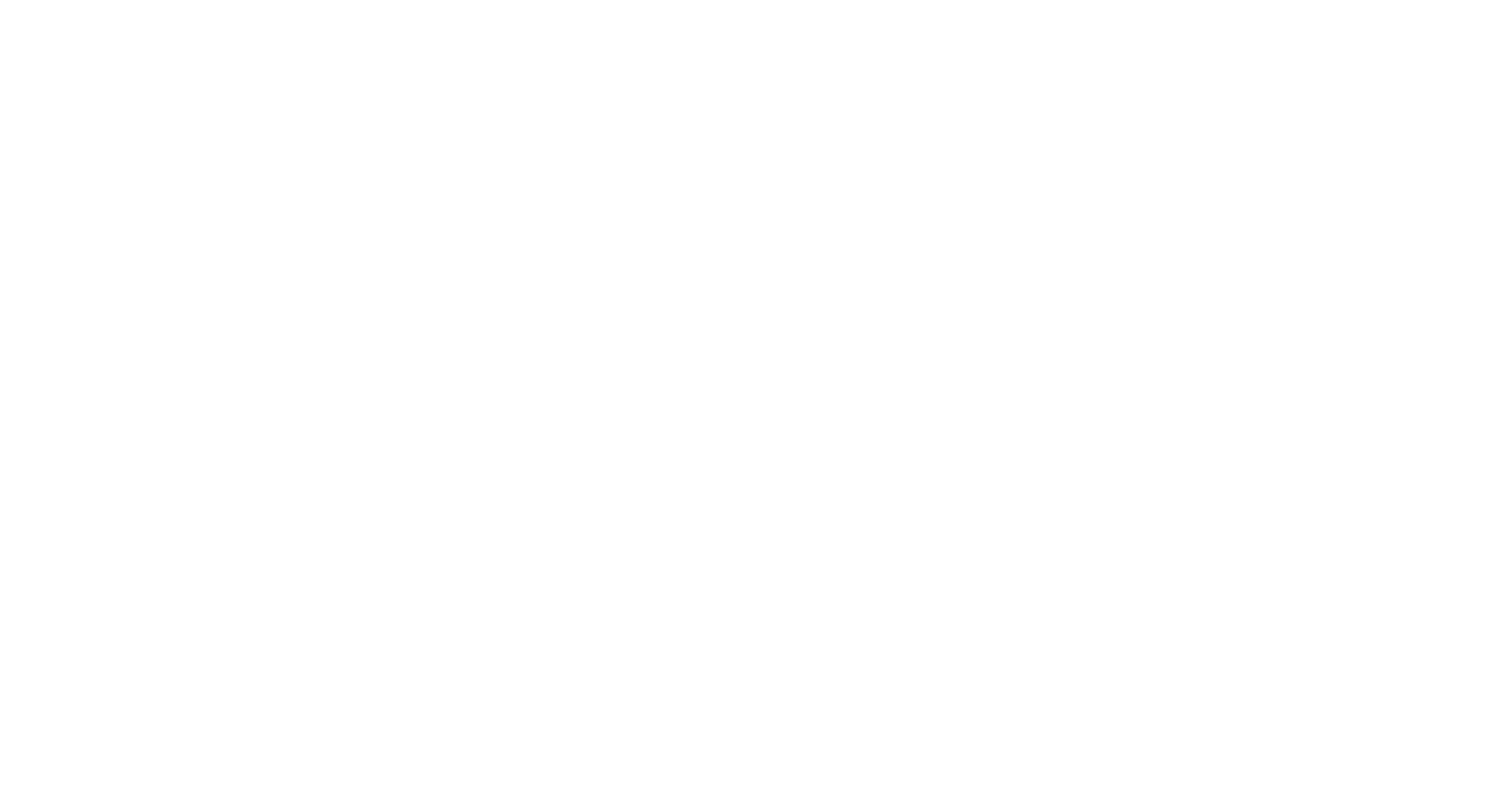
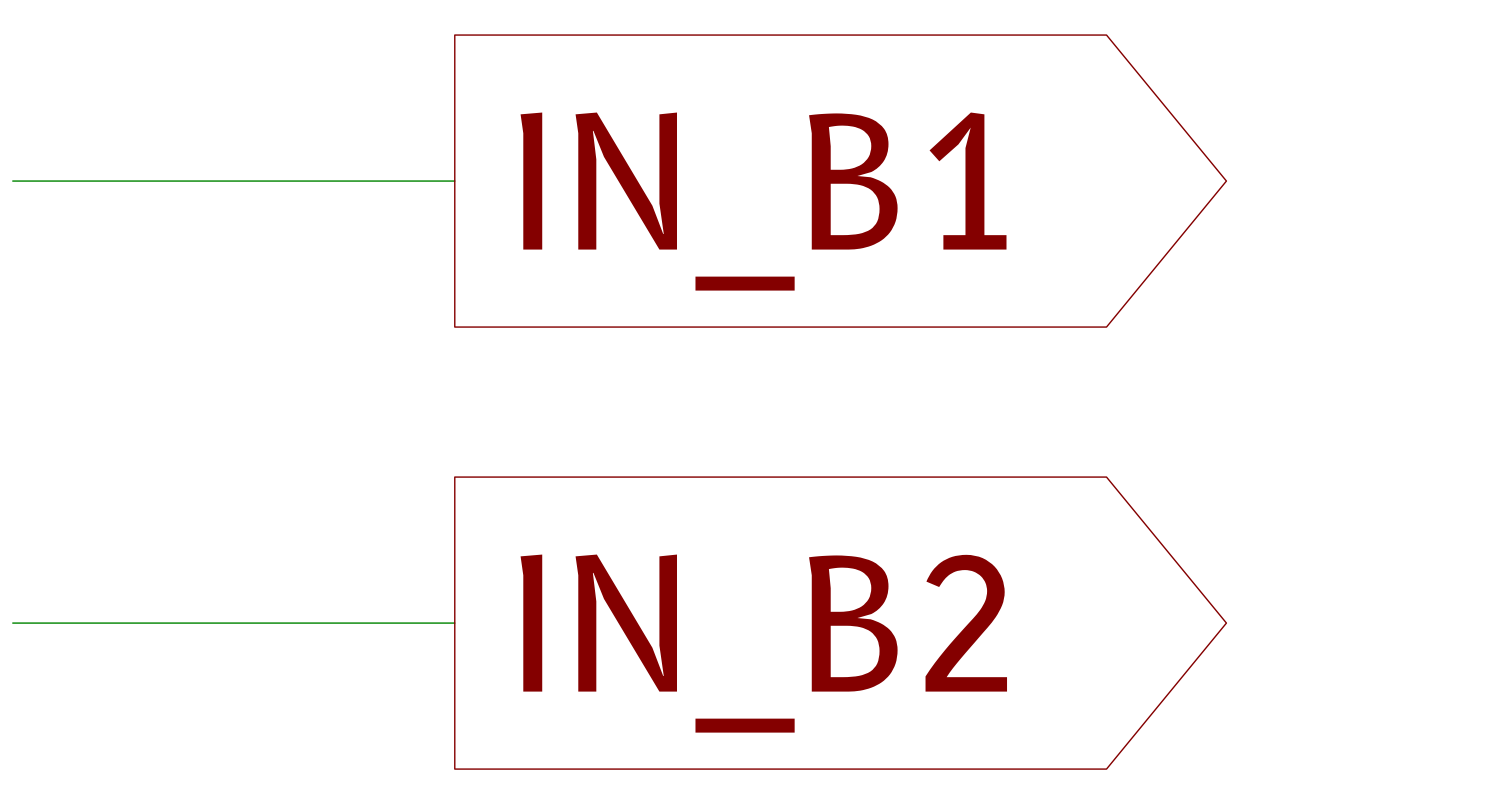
wire: none -> (12, 181) (454, 181)
global label: none -> IN_B1 (763, 201)
wire: none -> (12, 623) (454, 623)
global label: none -> IN_B2 (763, 643)

